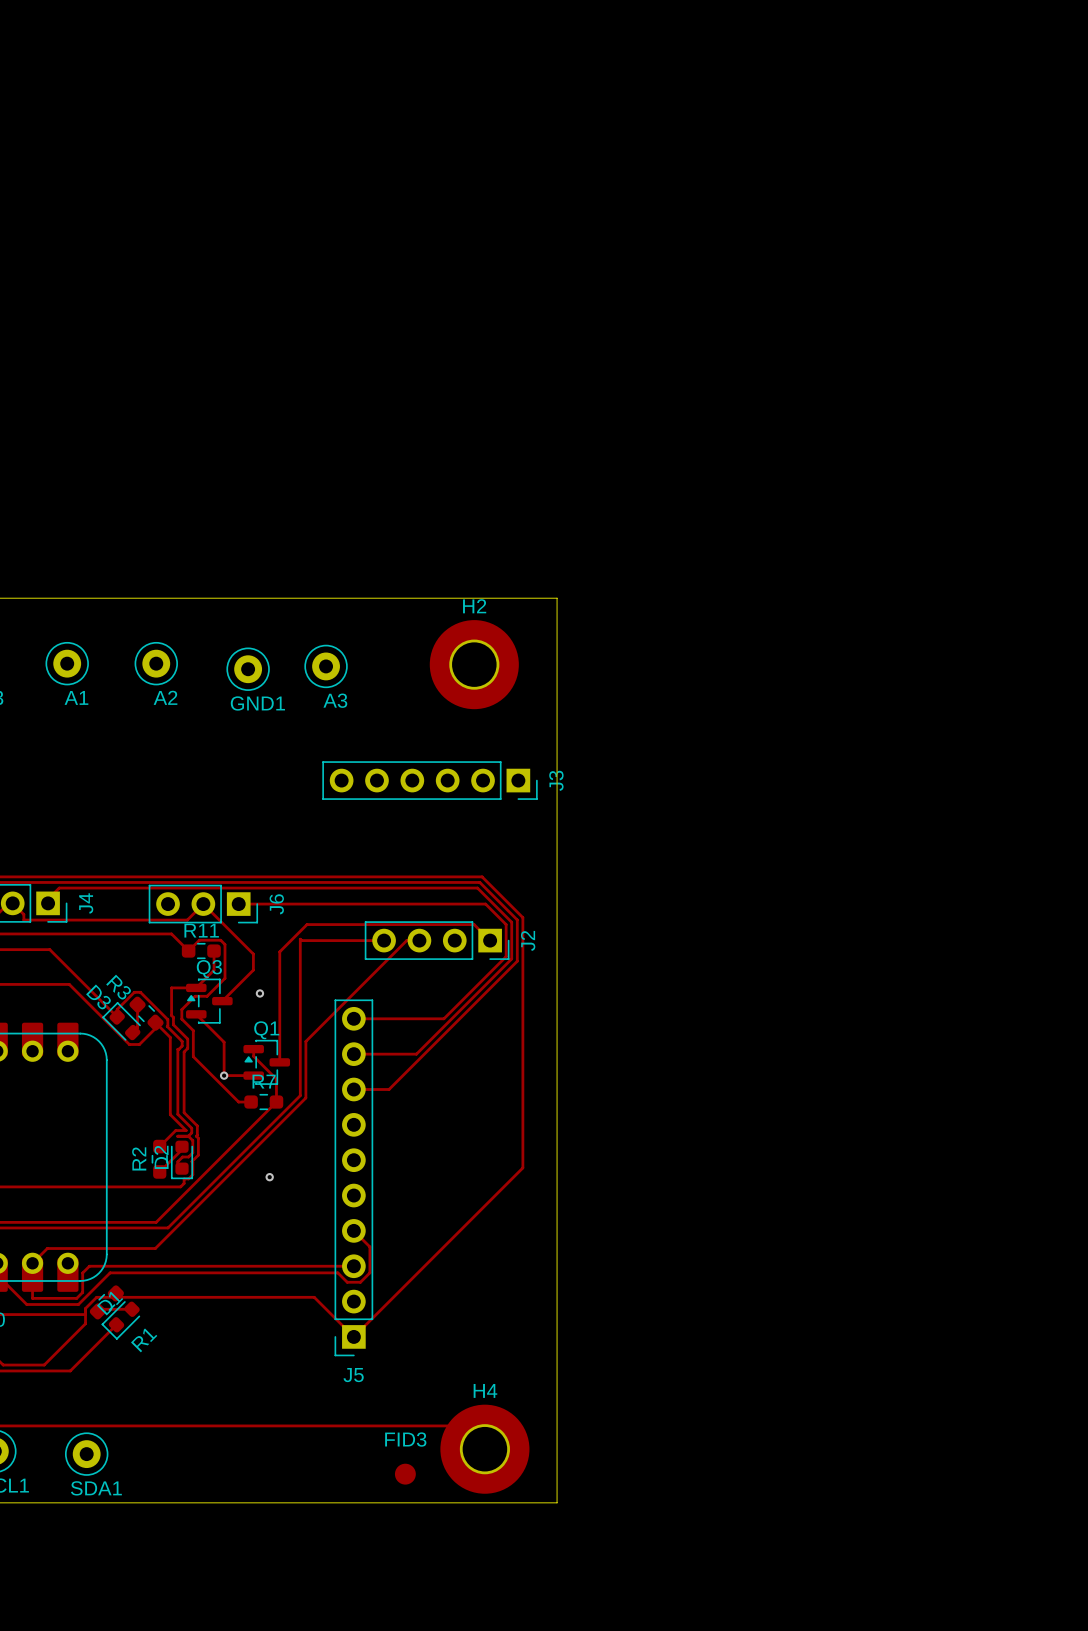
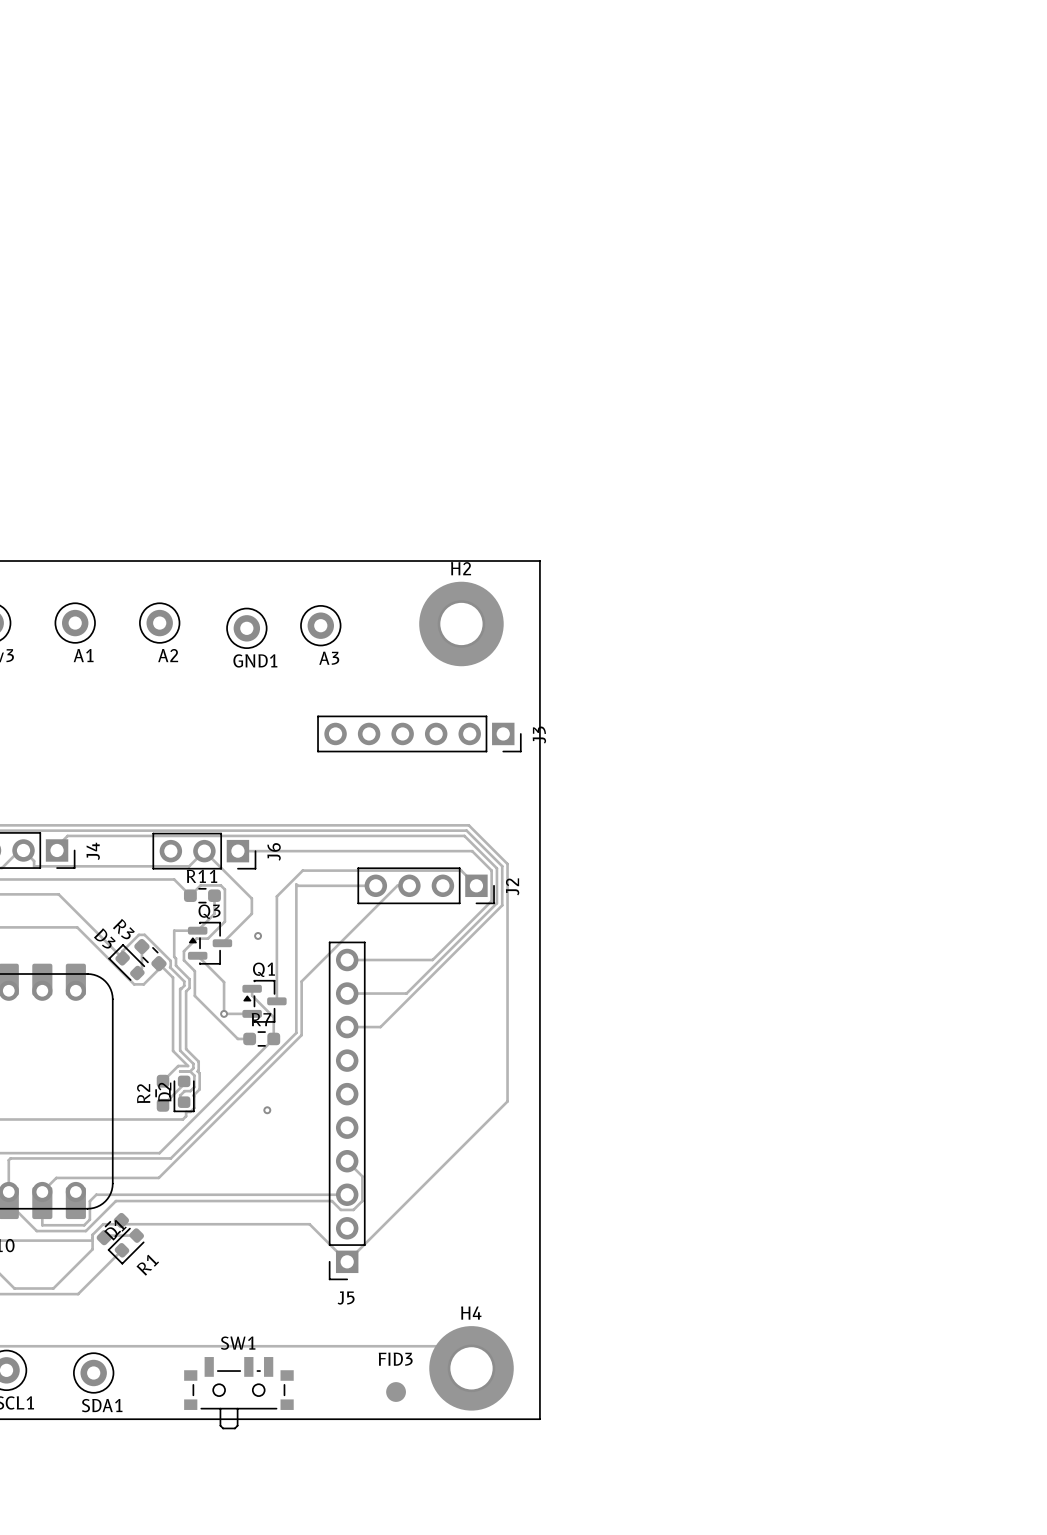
SW1: none -> (238, 1393)

